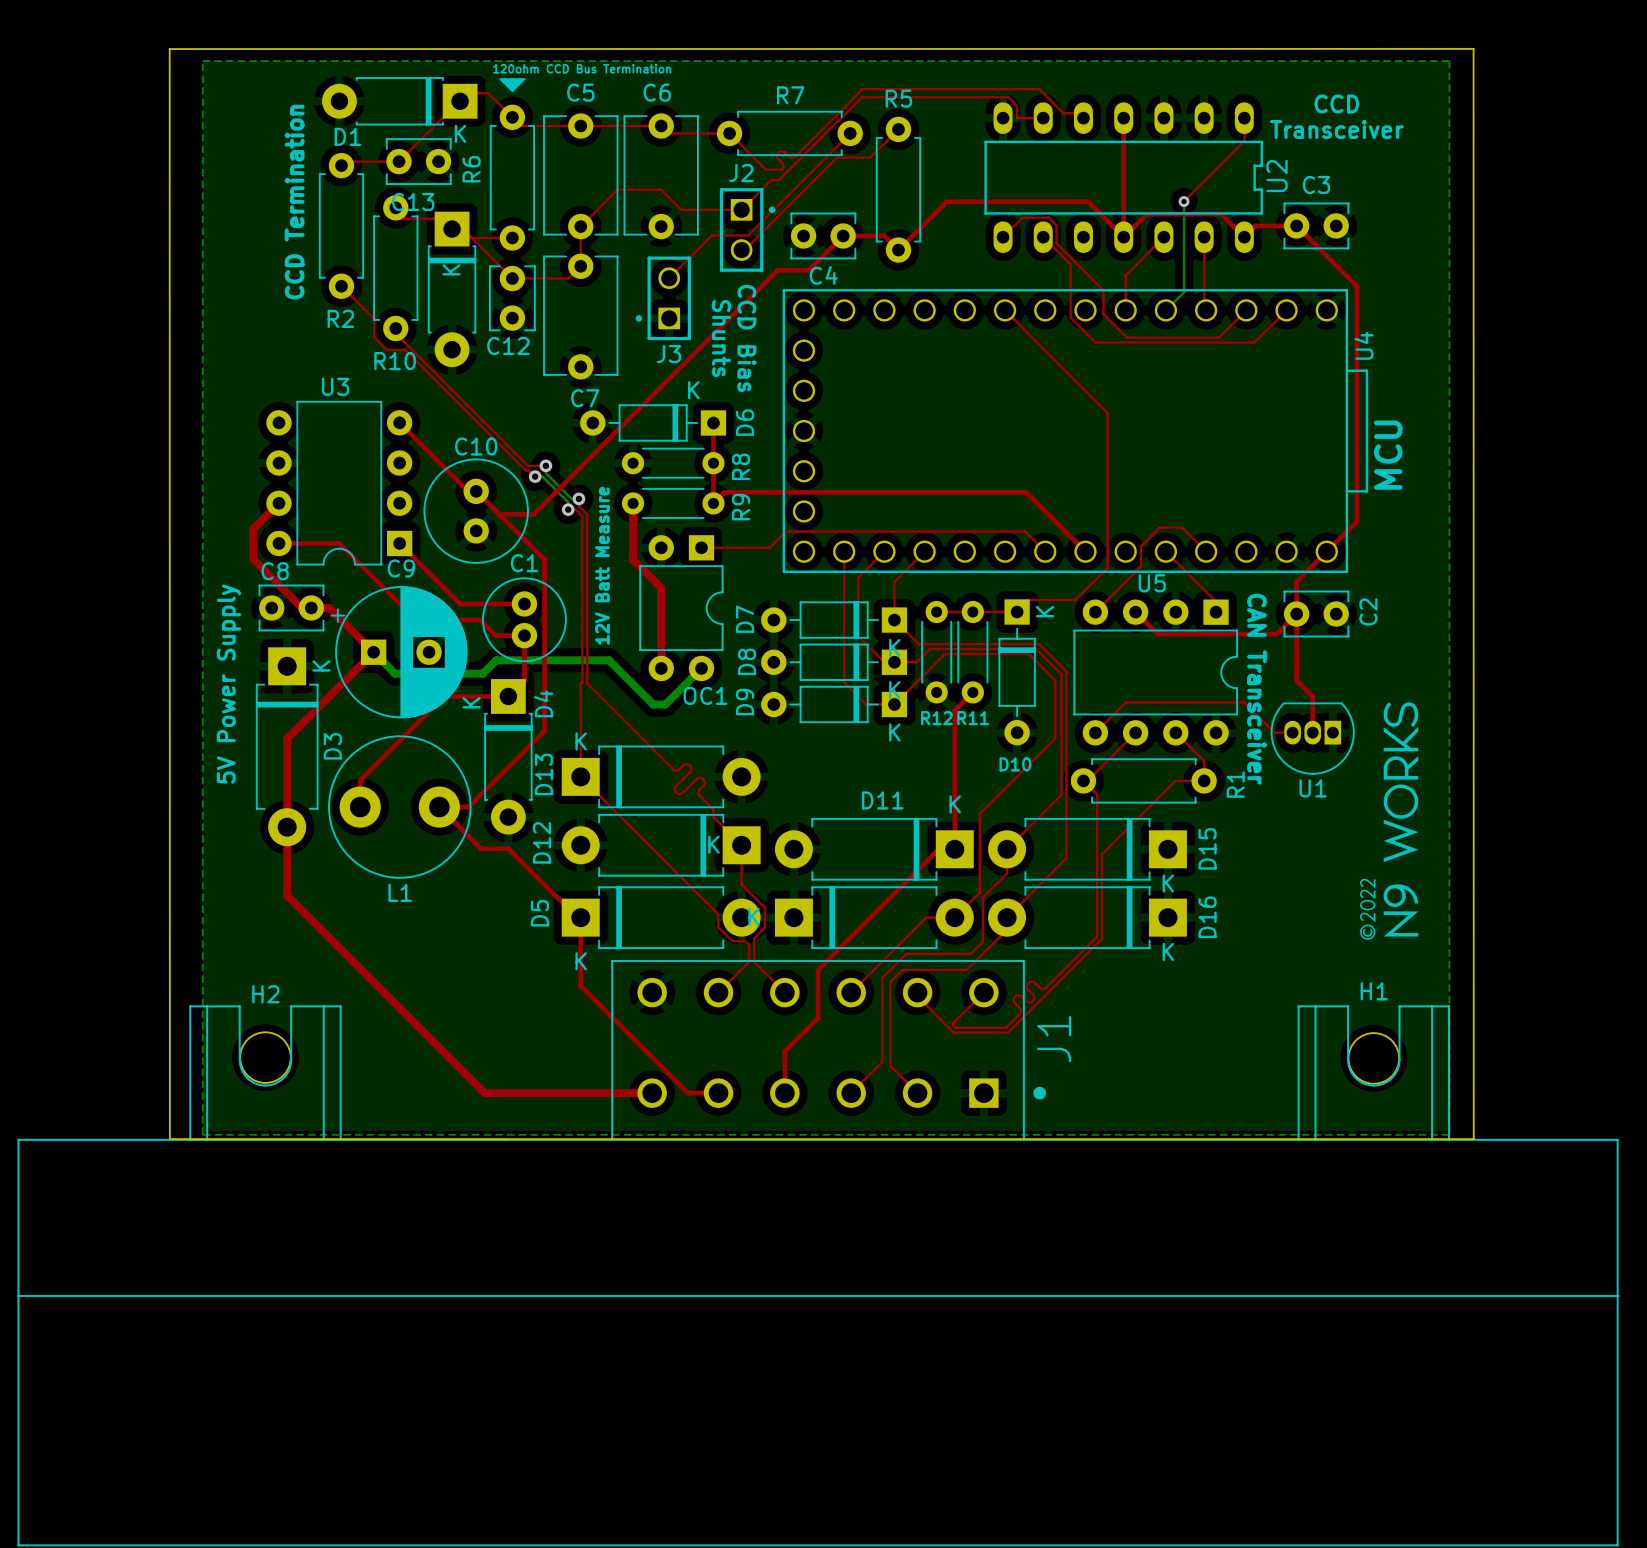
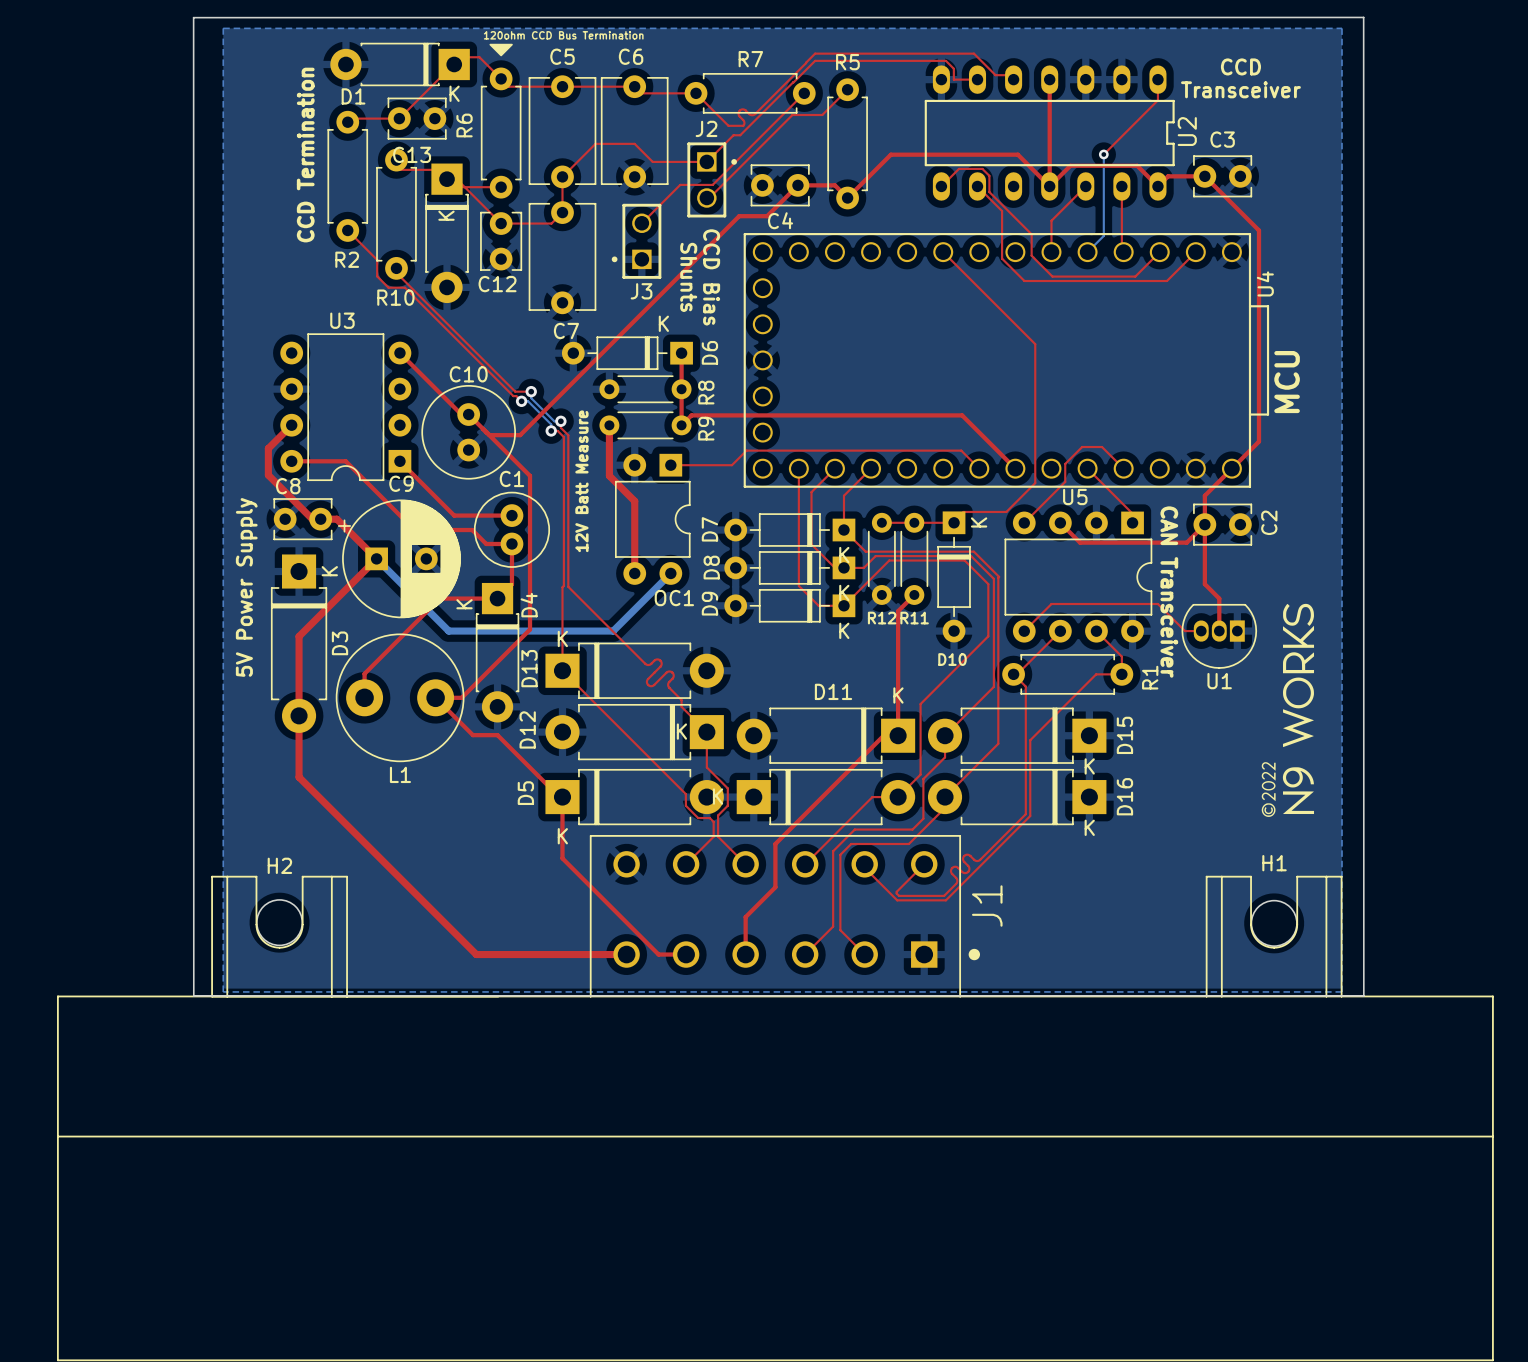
bottom track: (395, 673) (482, 673) (496, 660) (608, 660) (653, 704) (665, 704) -> (395, 578) (448, 631) (613, 631) (638, 605)

